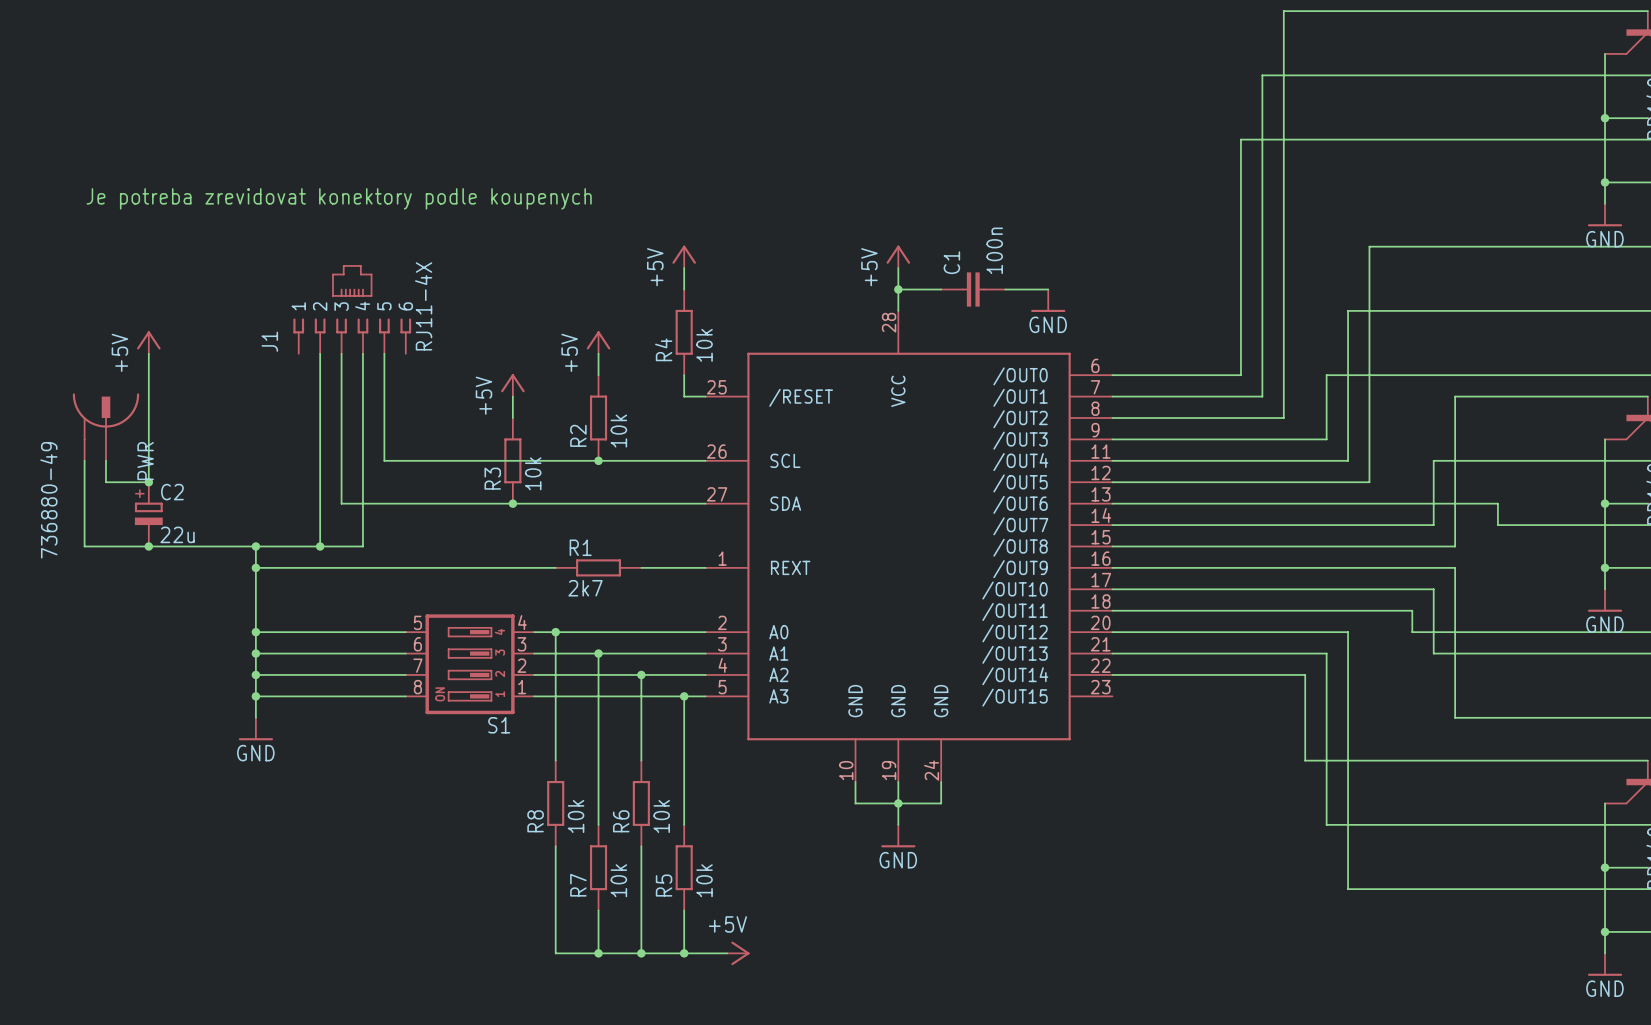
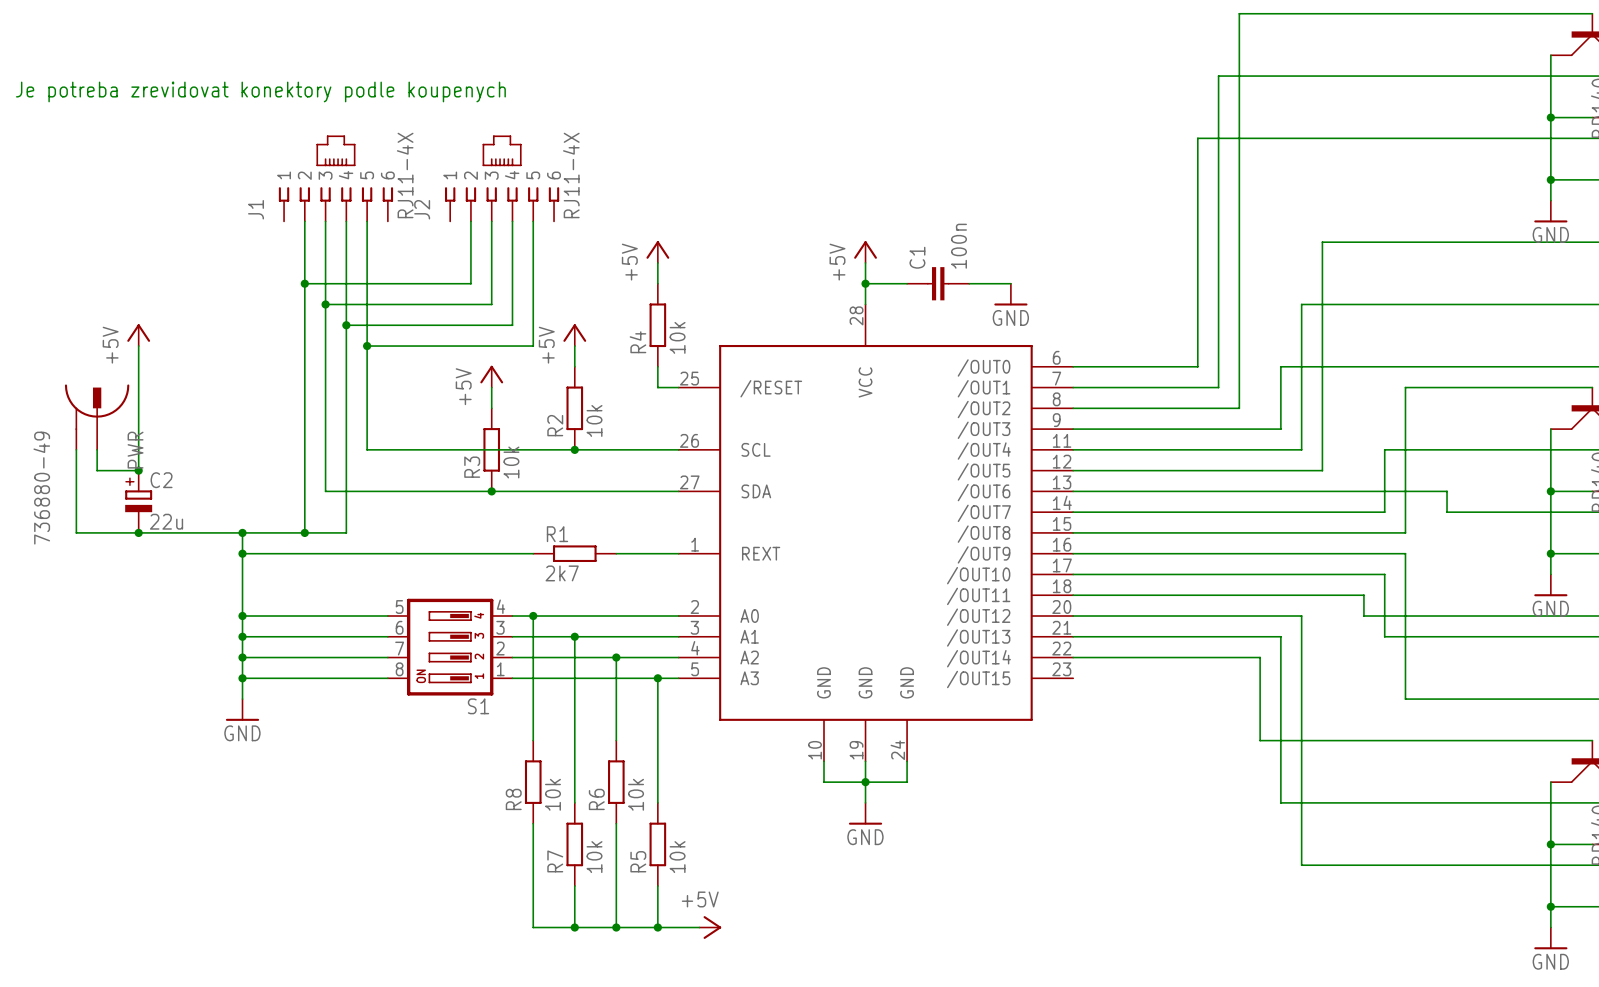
J2: none -> RJ11-4X (502, 178)
text position: Je potreba zrevidovat konektory podle koupenych (339, 198) -> Je potreba zrevidovat konektory podle koupenych (260, 91)
wire: none -> (304, 221) (304, 346)
wire: none -> (325, 221) (325, 346)
wire: none -> (346, 221) (346, 346)
wire: none -> (367, 221) (367, 346) (533, 346) (533, 221)
wire: none -> (470, 221) (470, 283) (304, 283)
wire: none -> (491, 221) (491, 304) (325, 304)
wire: none -> (512, 221) (512, 325) (346, 325)
junction: none -> (304, 283)
J1 position: (352, 309) -> (335, 178)
junction: none -> (325, 304)
junction: none -> (346, 325)
junction: none -> (367, 346)

